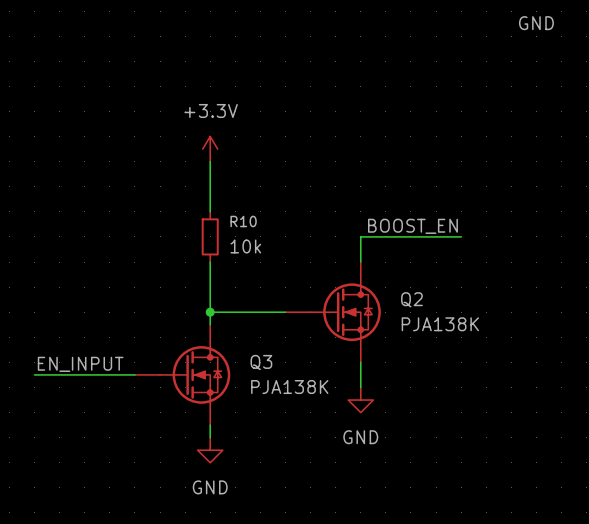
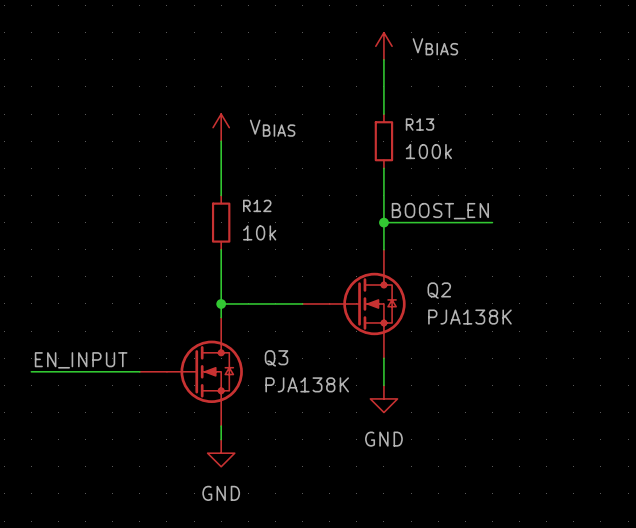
power symbol: none -> VBIAS (383, 46)
wire: none -> (383, 59) (383, 114)
power symbol: +3.3V (210, 149) -> VBIAS (221, 127)
R13: none -> 100k (383, 141)
wire: none -> (383, 168) (383, 222)
R10 name: R10 (243, 221) -> R12 (257, 205)
junction: none -> (383, 222)

